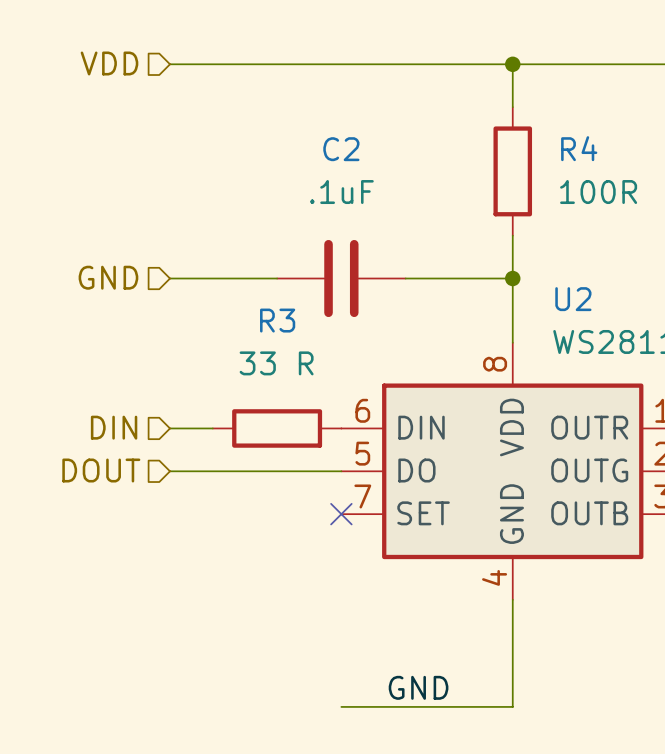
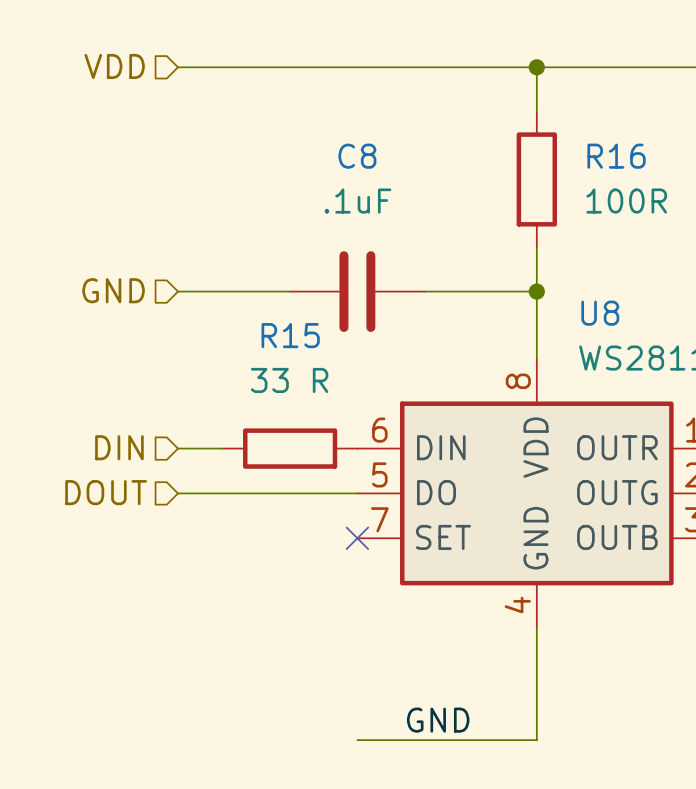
R4 name: R4 (579, 148) -> R16 (616, 156)
C2 name: C2 (341, 149) -> C8 (357, 156)
U2 name: U2 (573, 299) -> U8 (600, 313)
R3 name: R3 (277, 320) -> R15 (290, 335)

